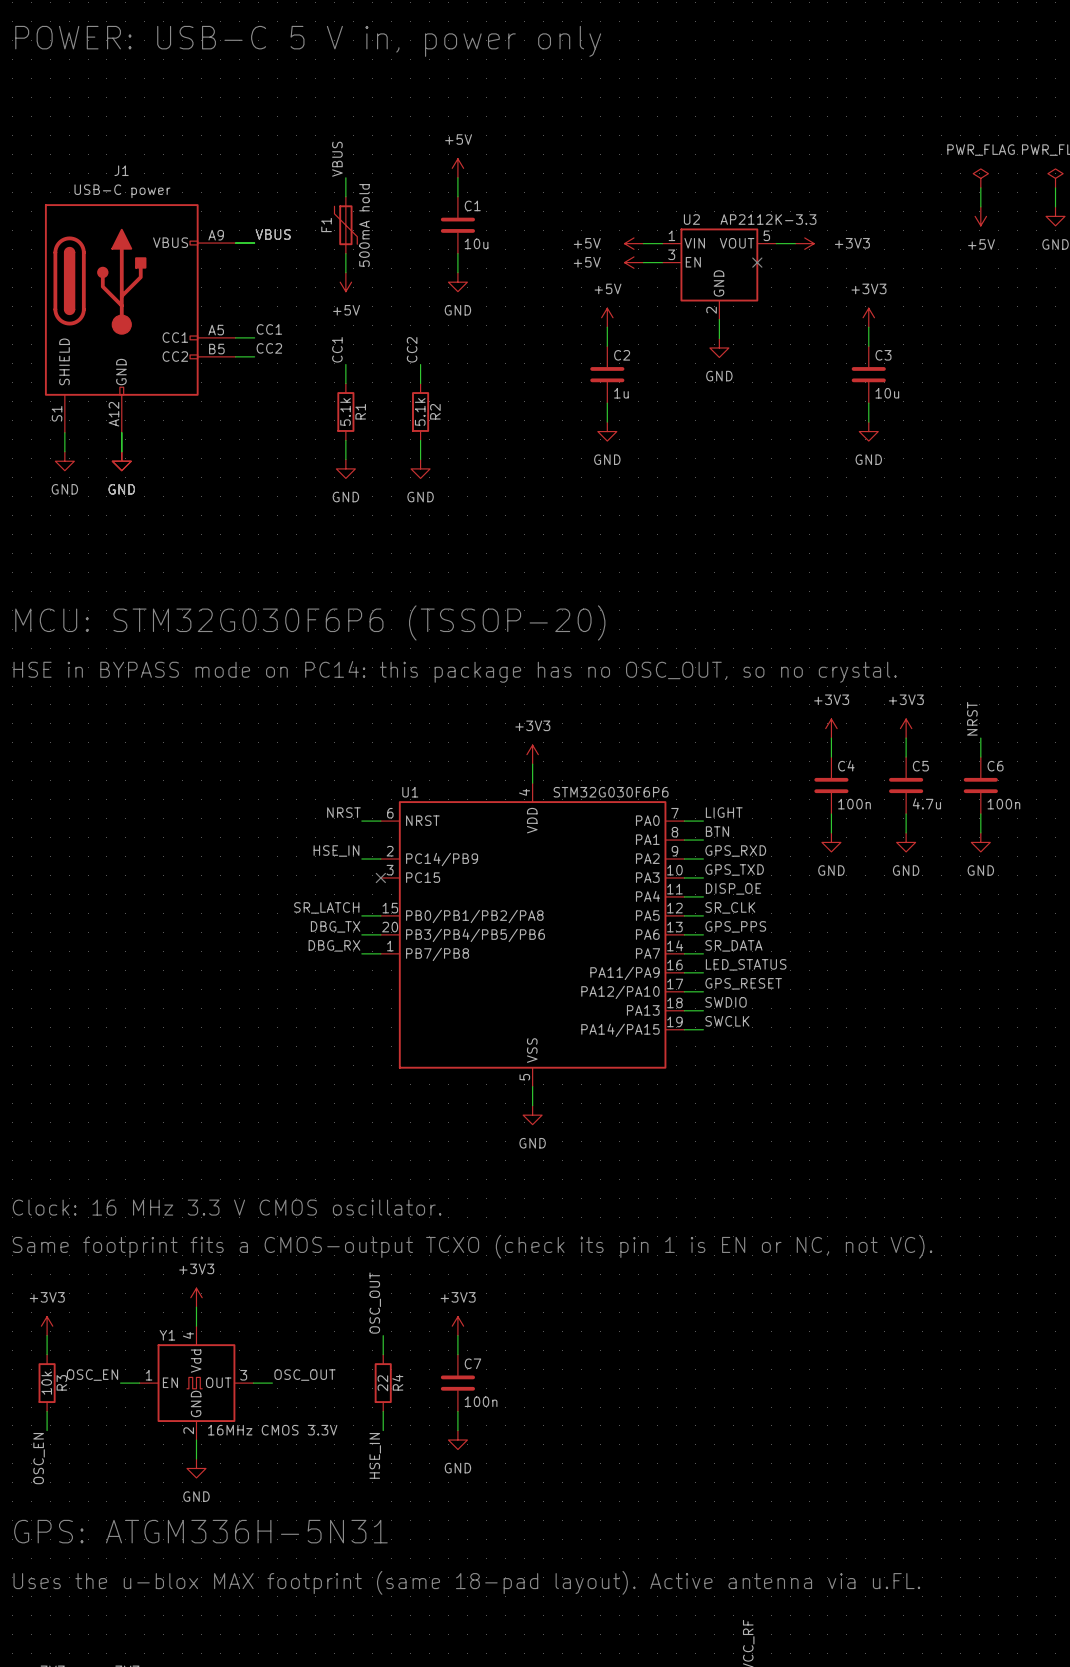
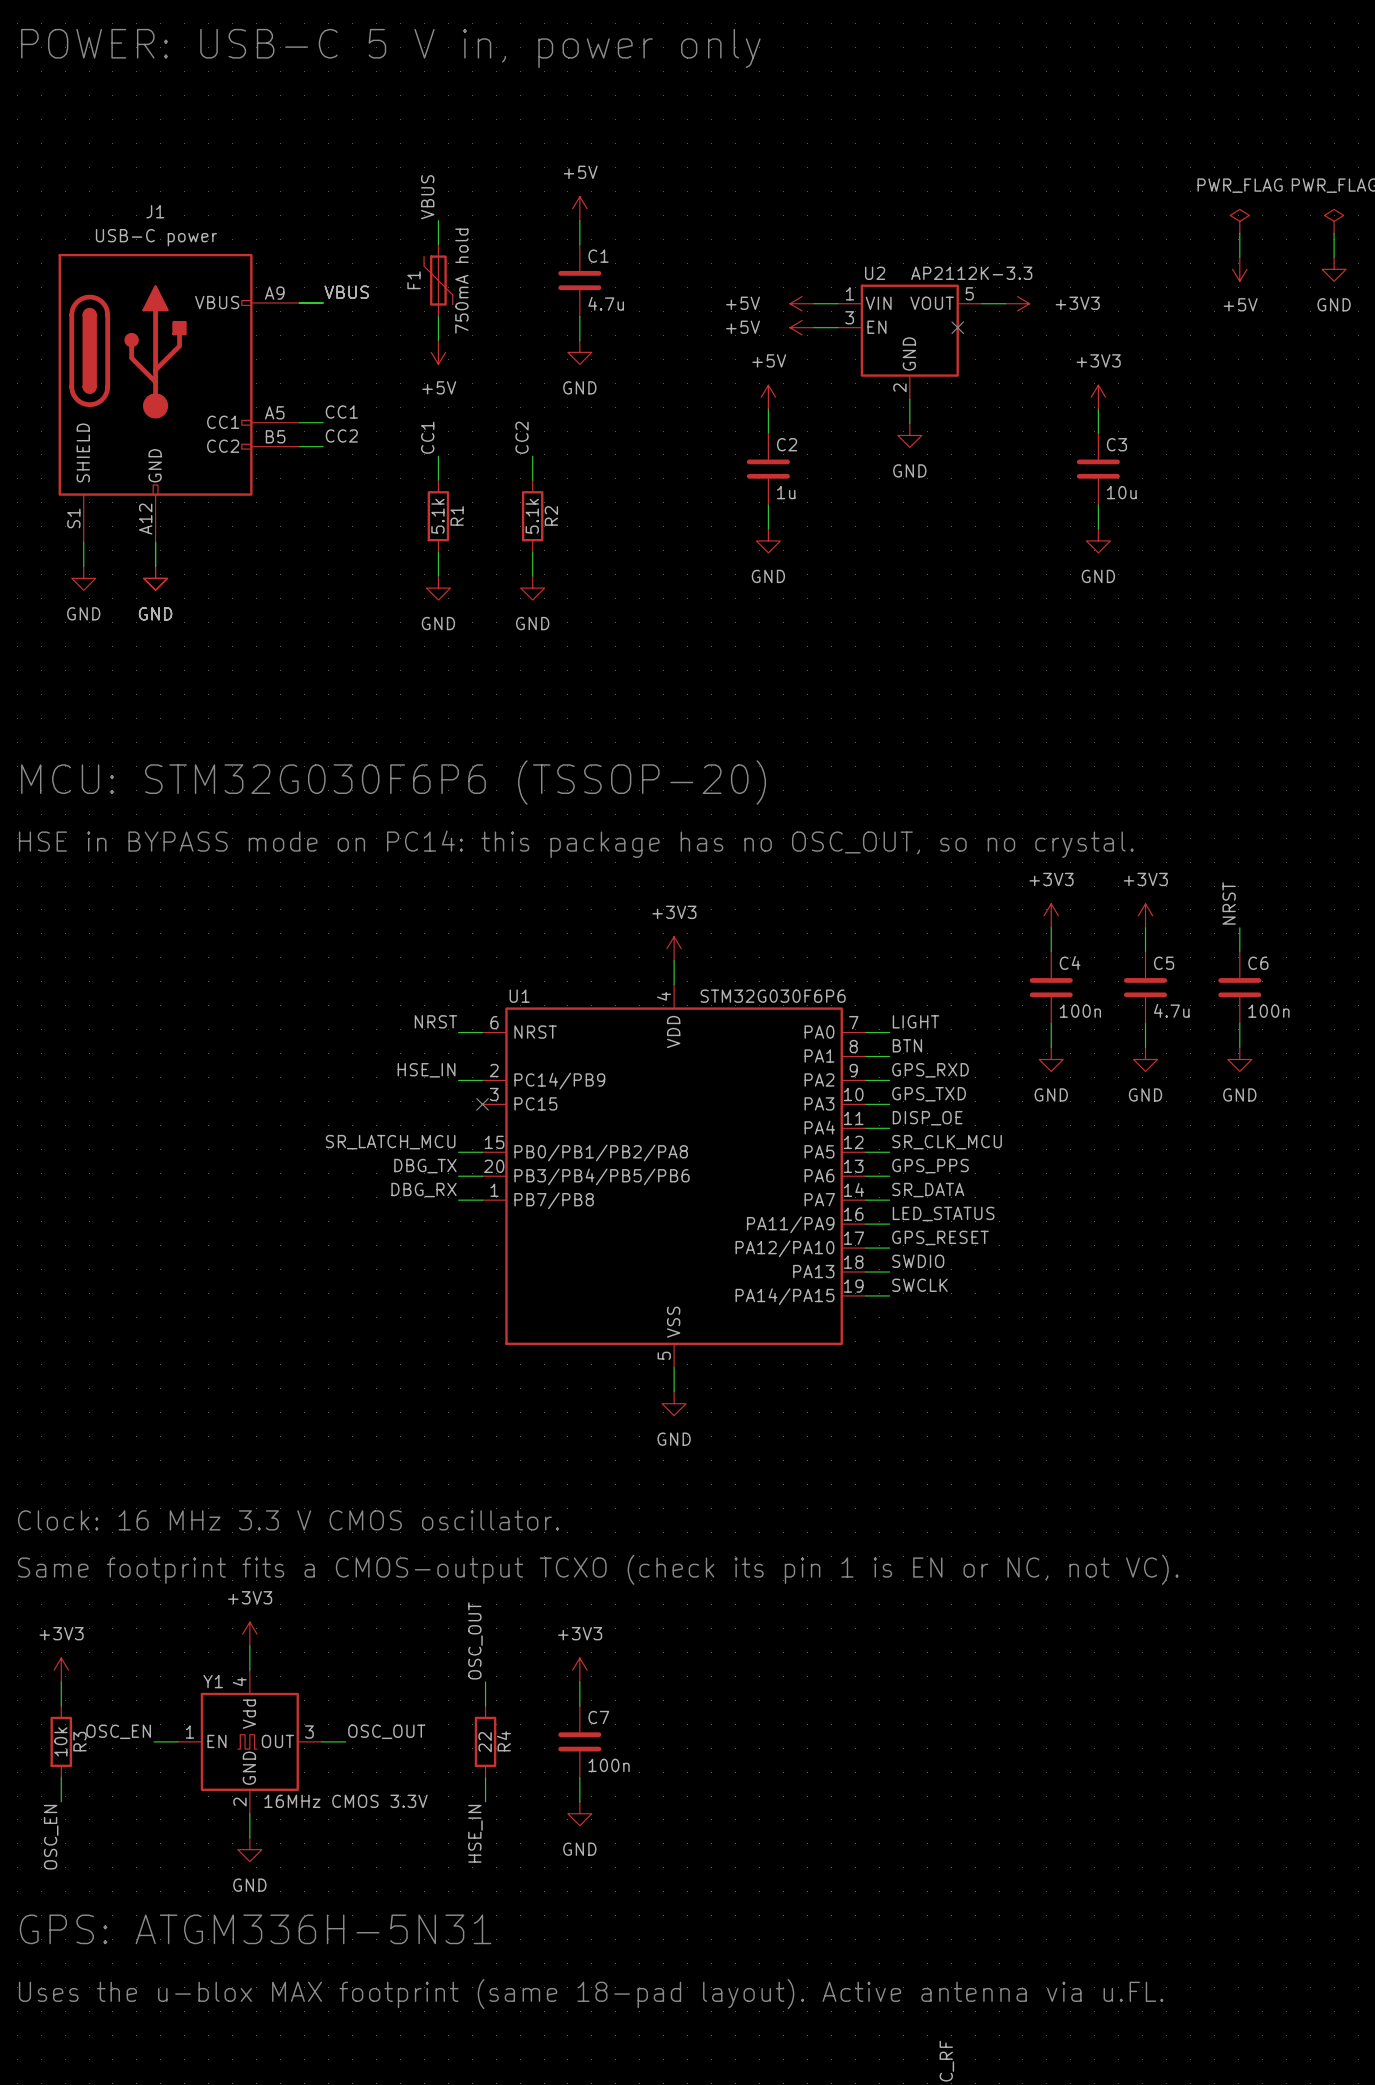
F1 value: 500mA hold (364, 225) -> 750mA hold (461, 281)
C1 value: 10u (476, 243) -> 4.7u (606, 303)
label: SR_LATCH (326, 907) -> SR_LATCH_MCU (390, 1142)
label: SR_CLK (730, 907) -> SR_CLK_MCU (947, 1142)

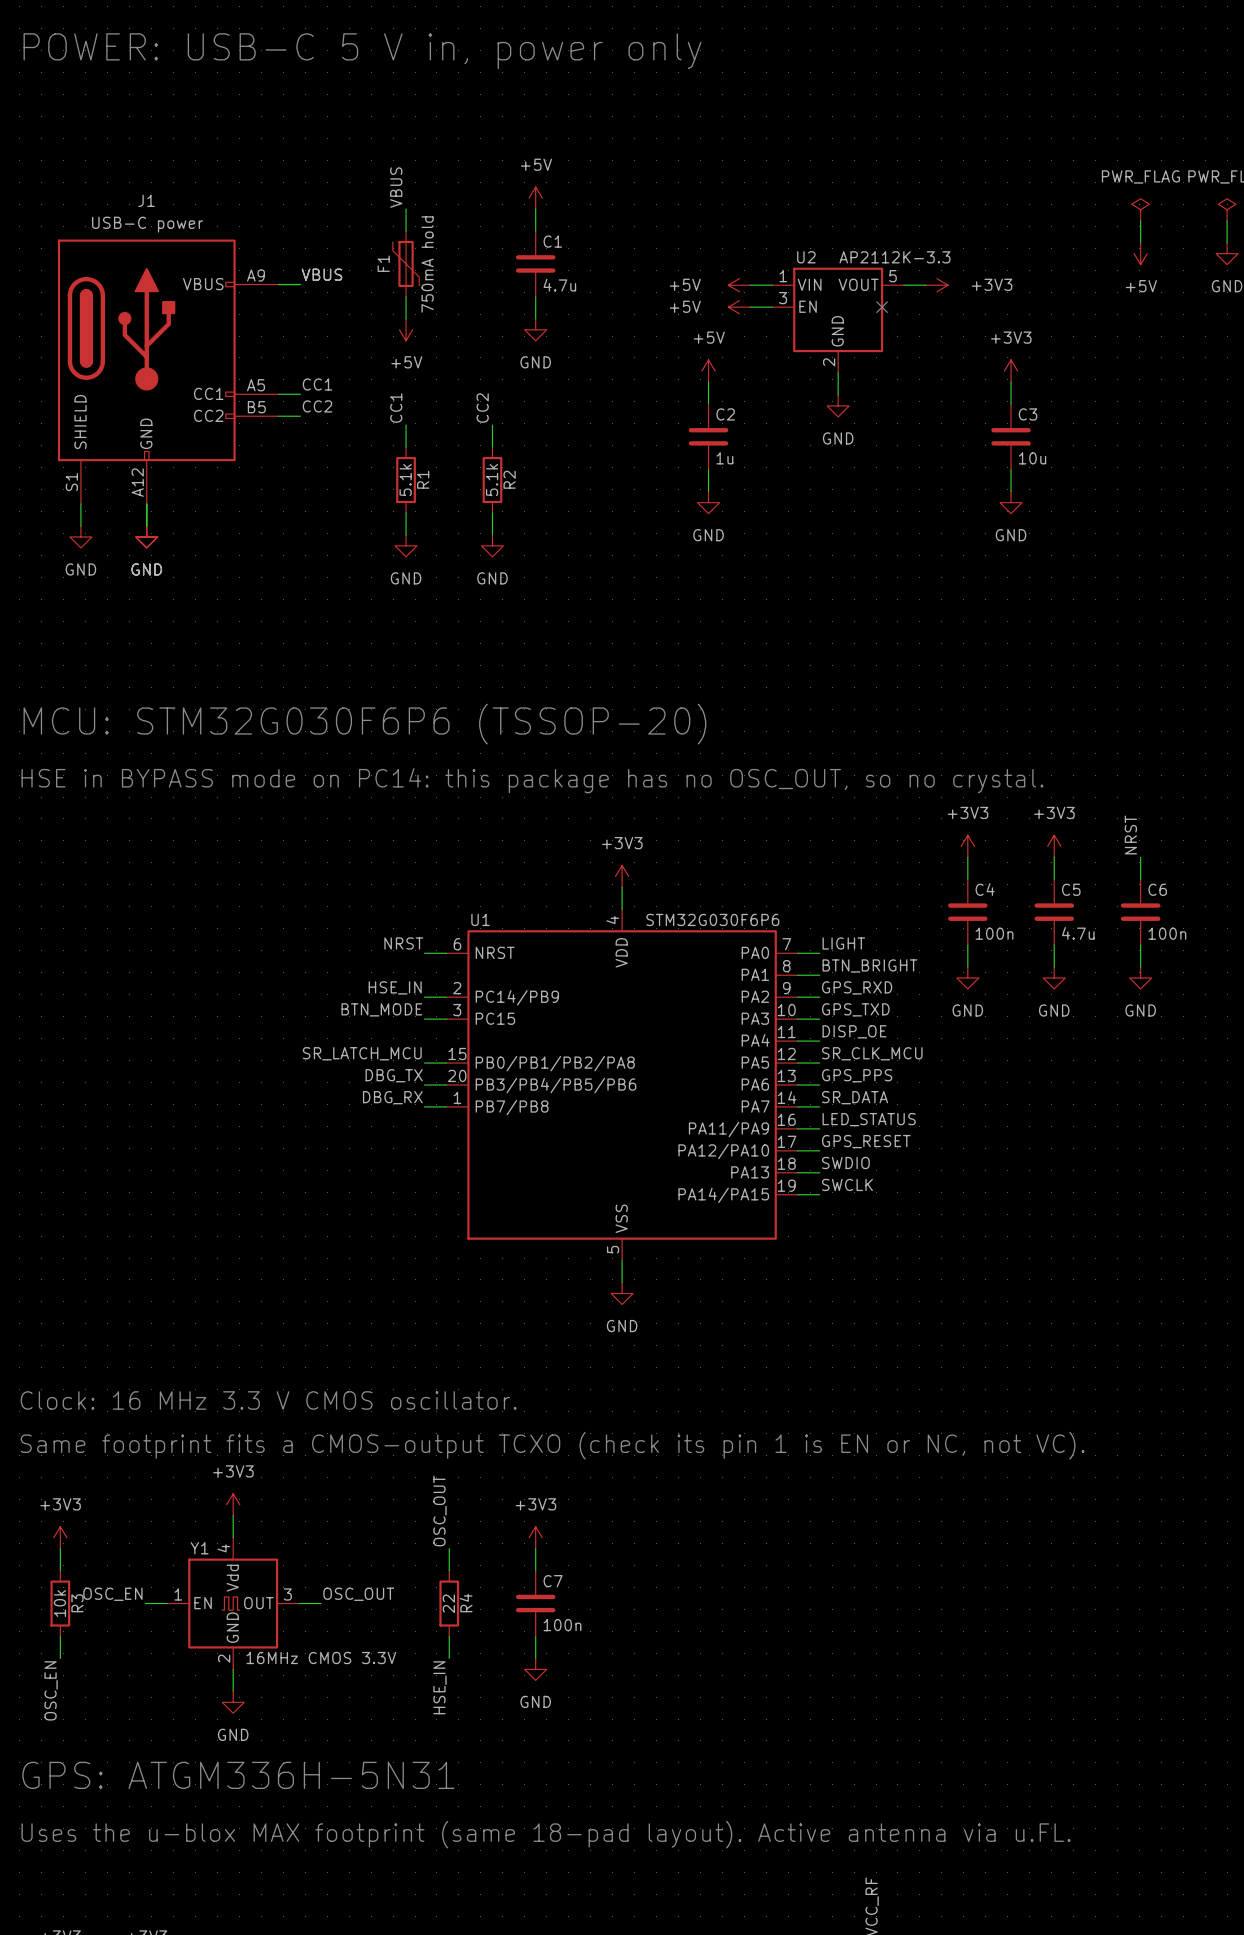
label: BTN (907, 1045) -> BTN_BRIGHT (869, 965)
label: none -> BTN_MODE (381, 1009)
wire: none -> (424, 1019) (446, 1019)
no-connect mark: (482, 1104) -> none

